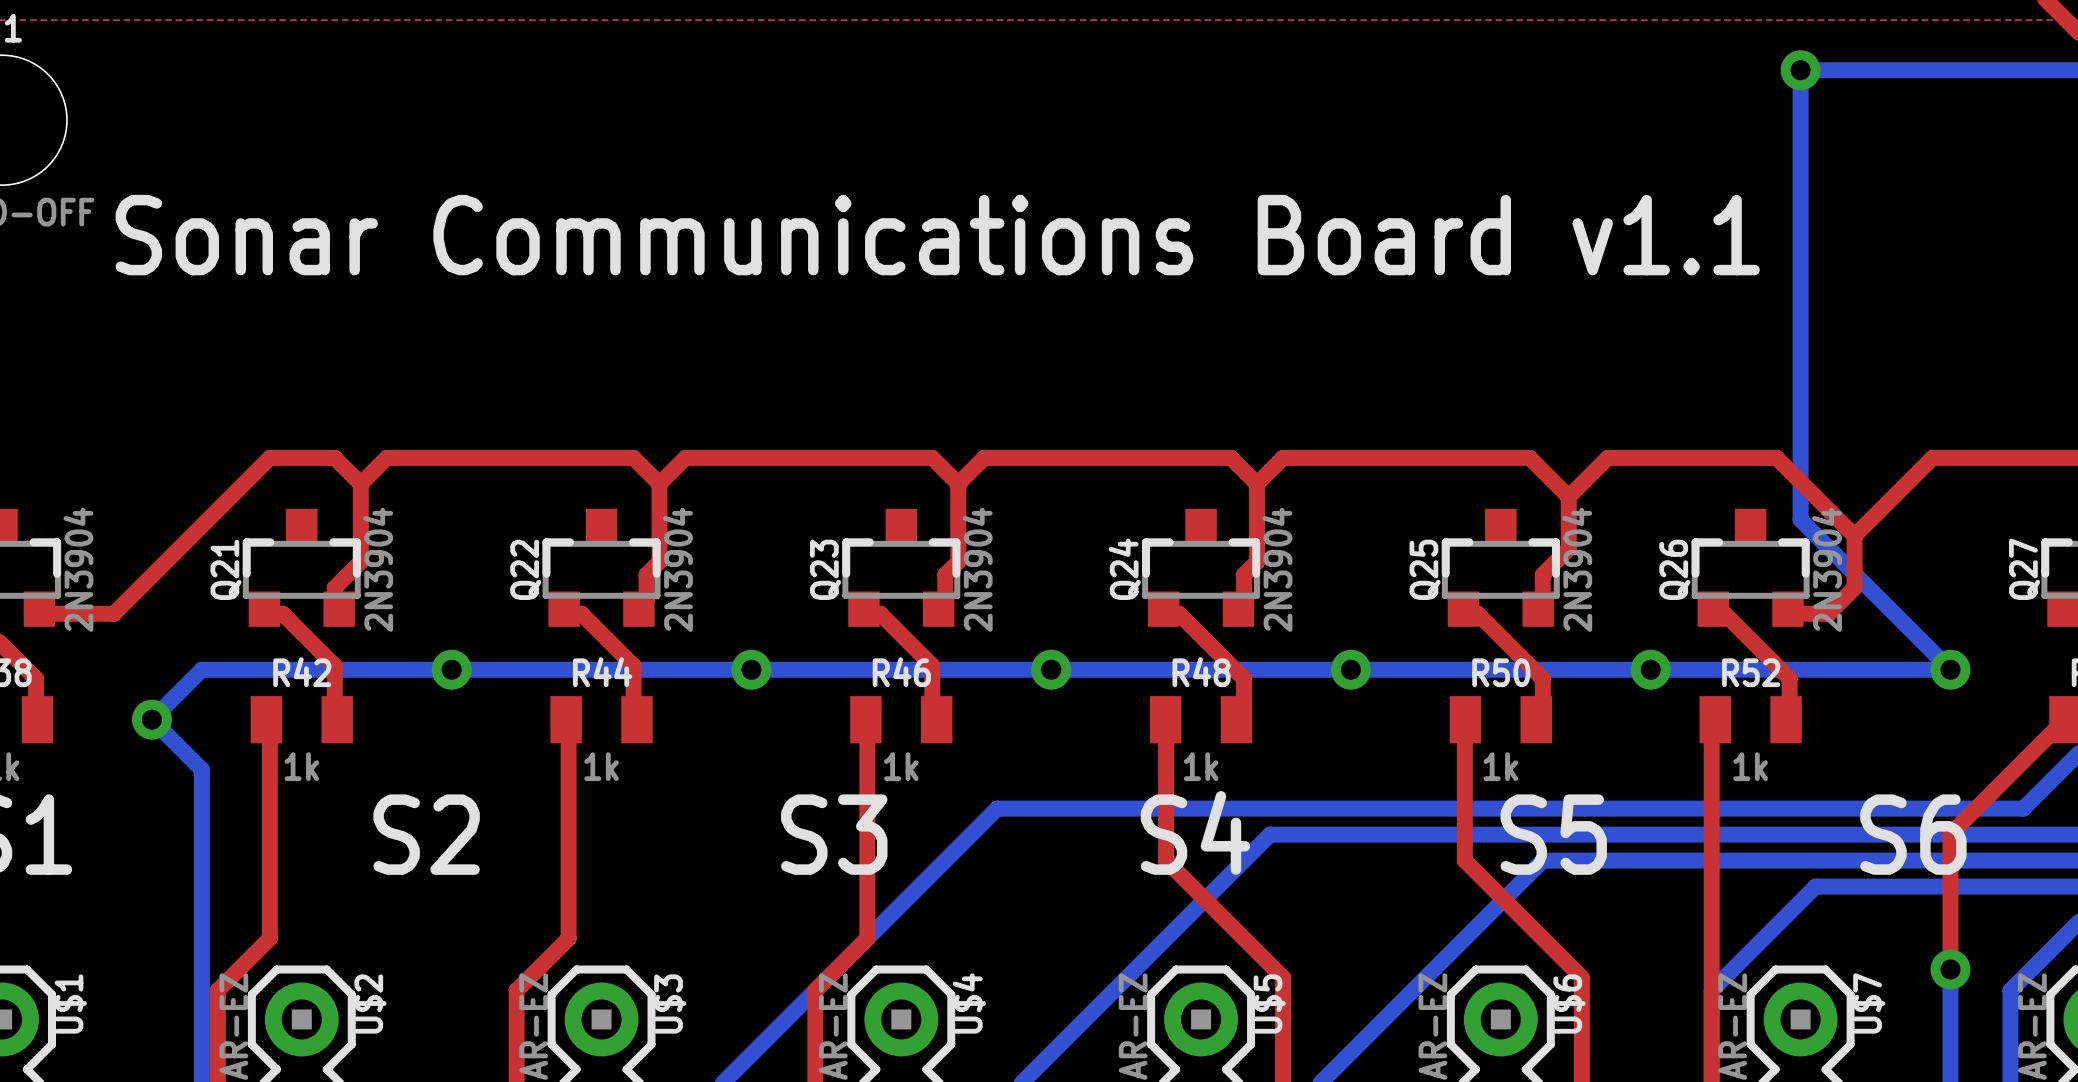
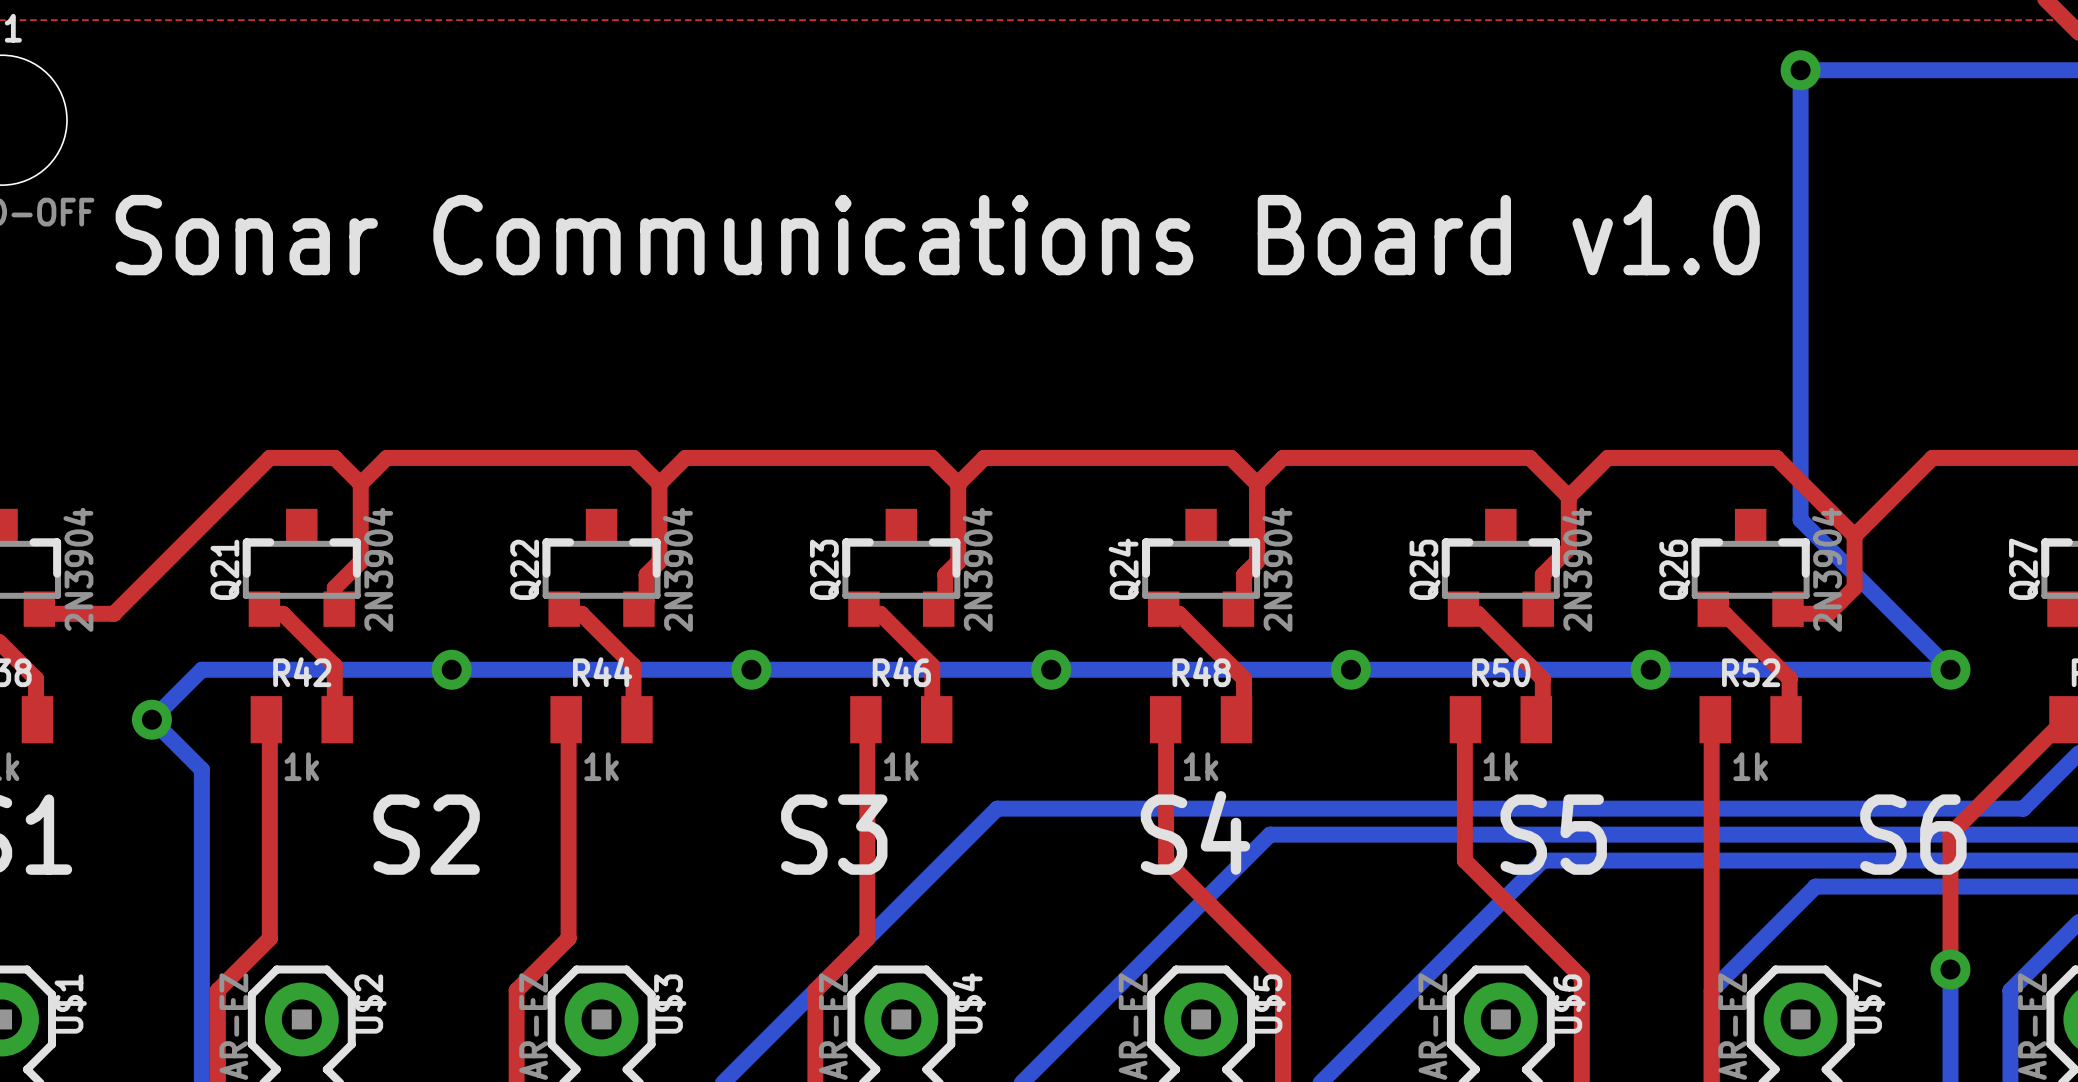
text: Sonar Communications Board v1.1 (937, 235) -> Sonar Communications Board v1.0 (937, 235)

